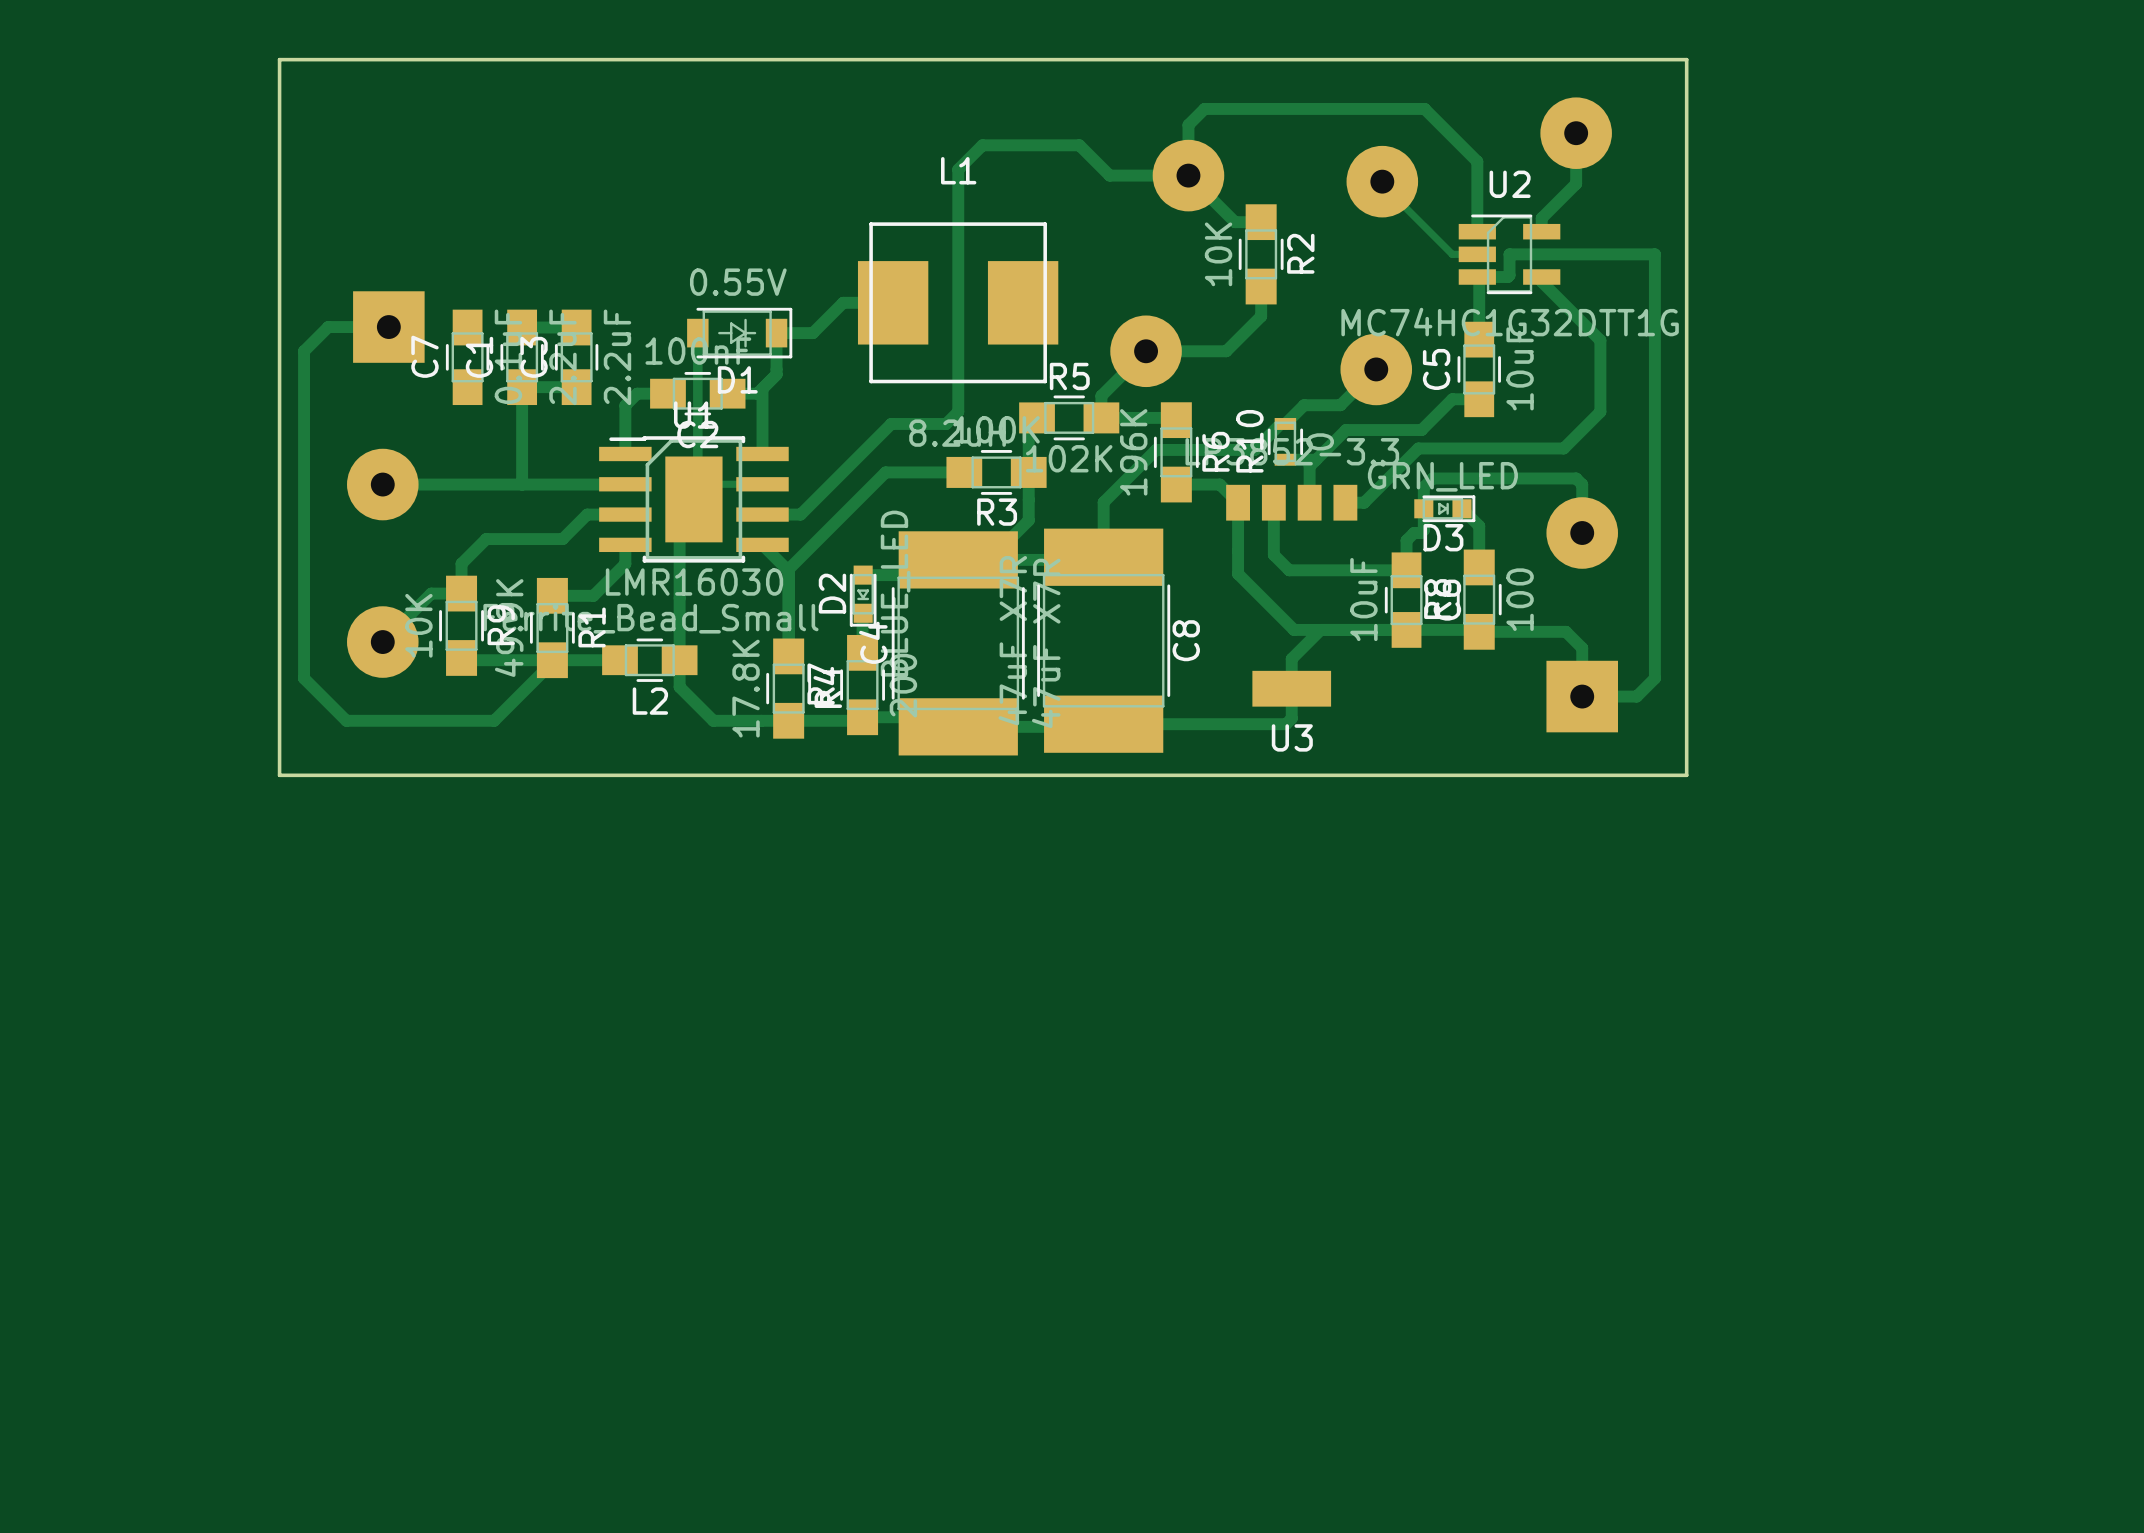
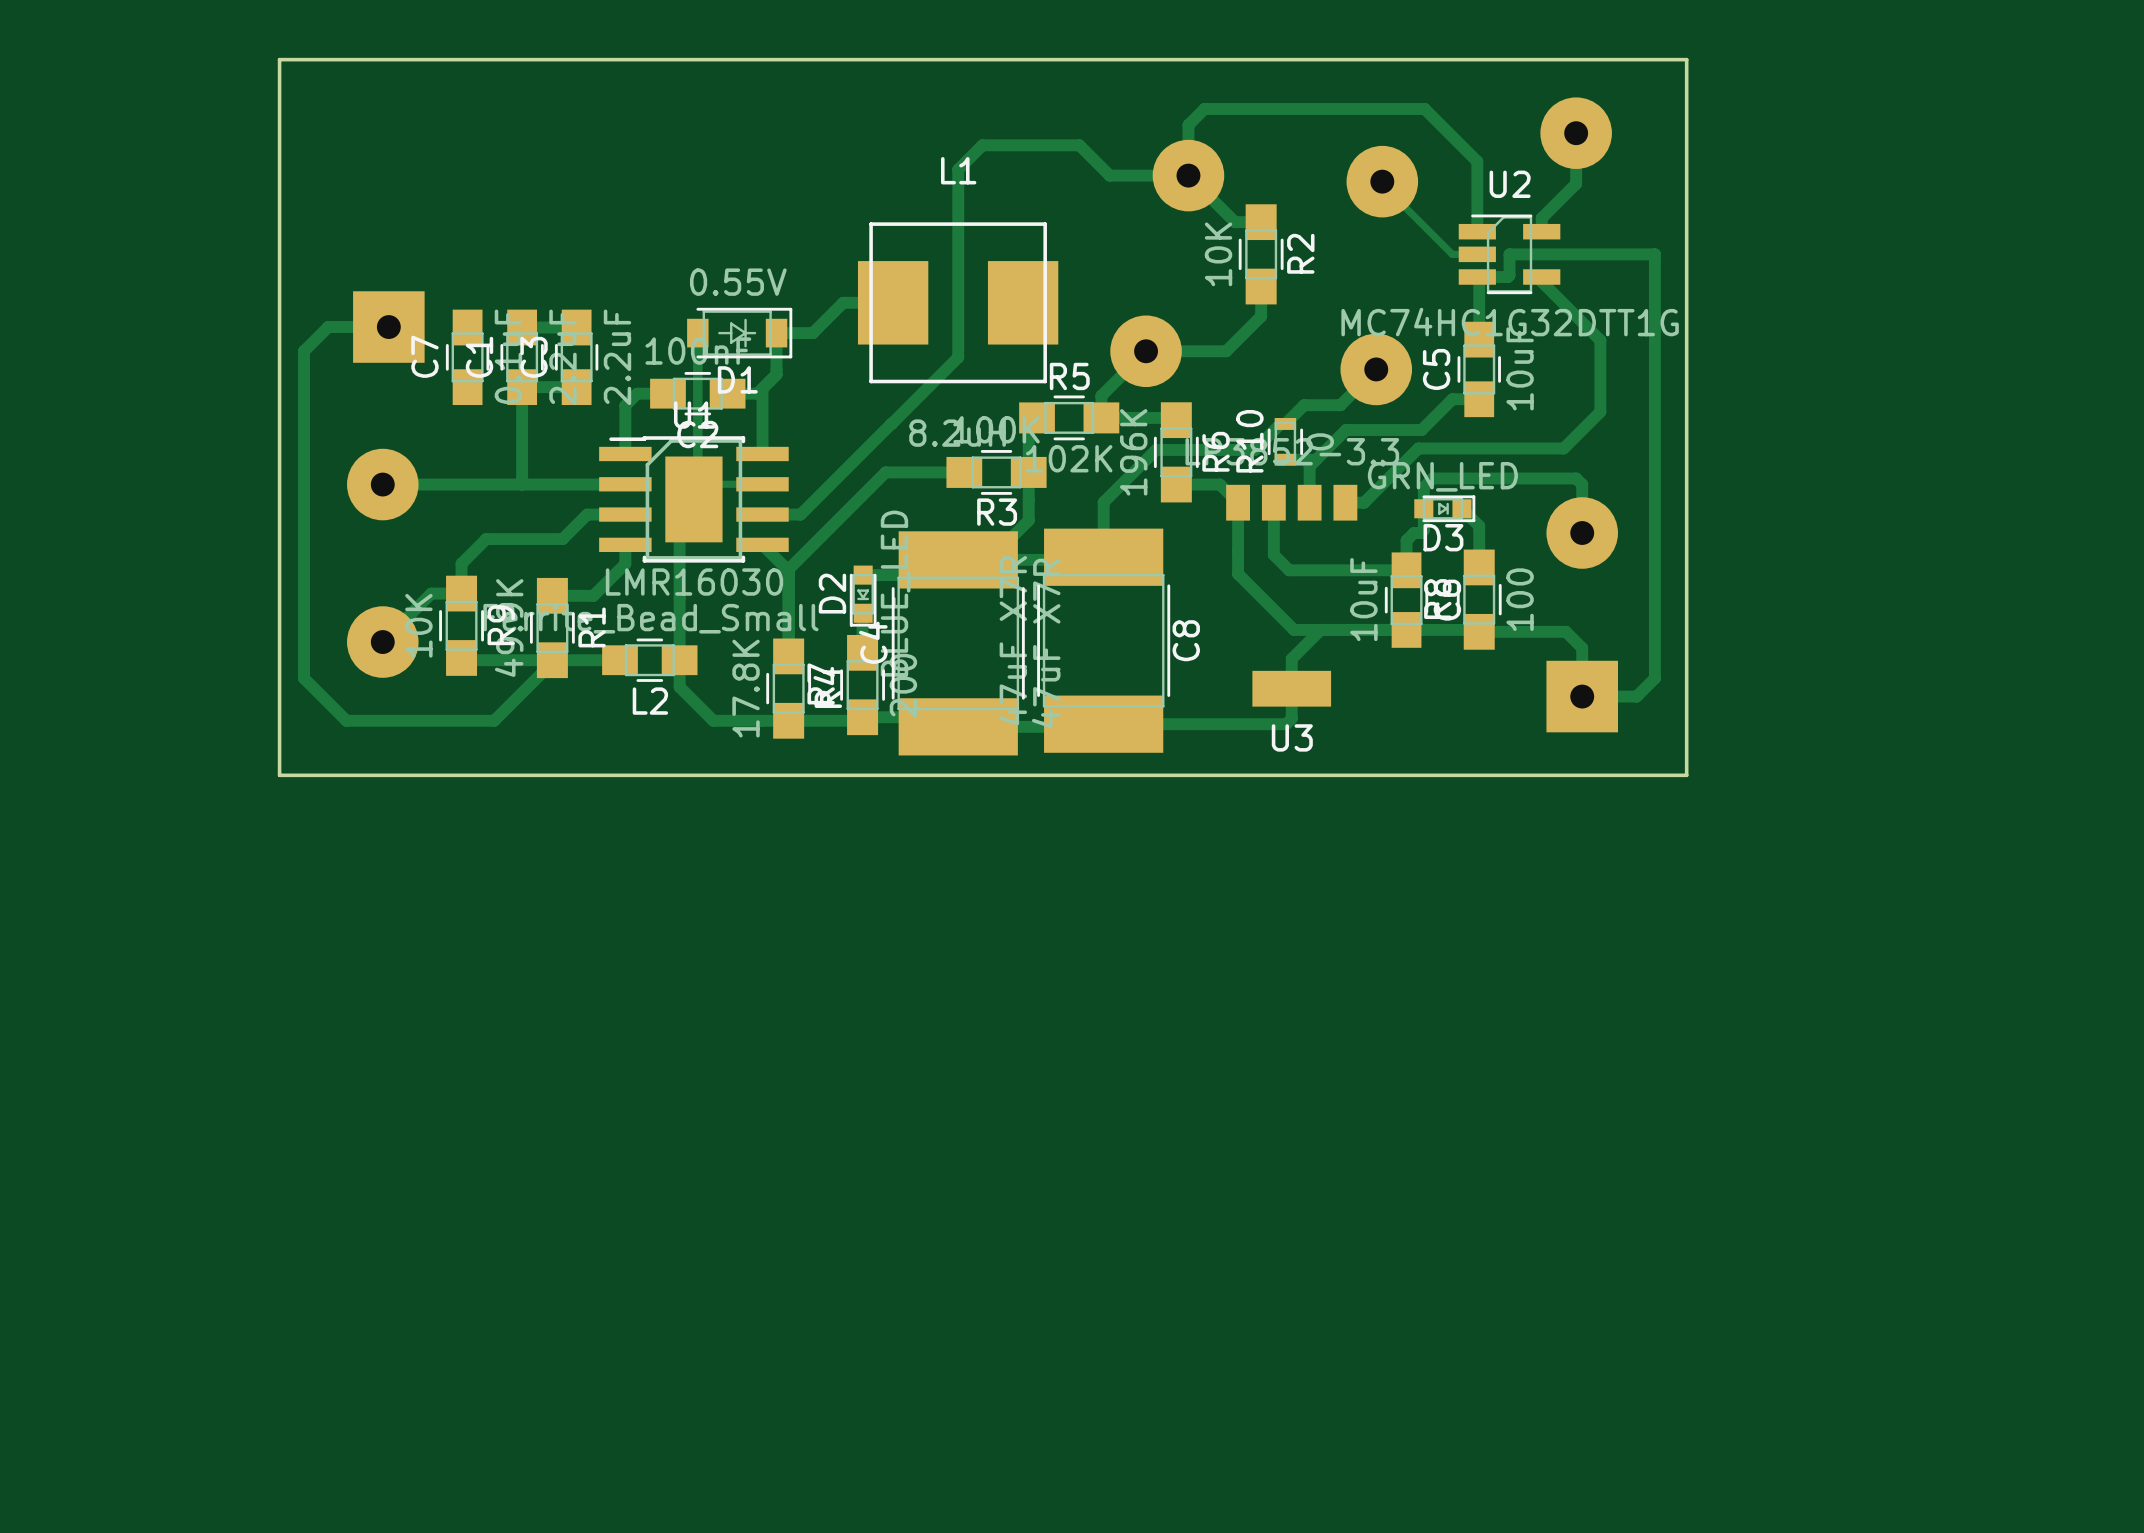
track: (958, 357) (958, 411) (946, 423) (891, 423) -> (958, 357) (891, 423)

